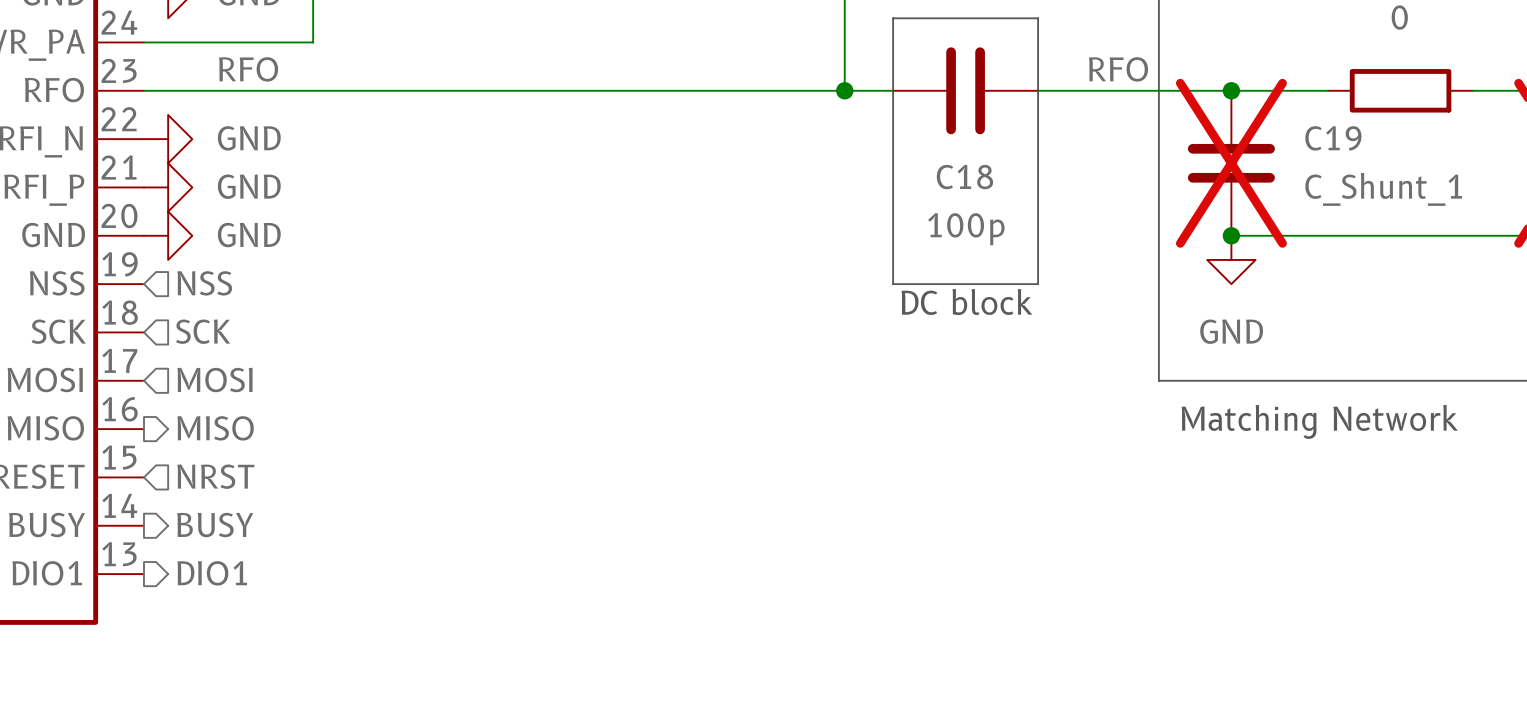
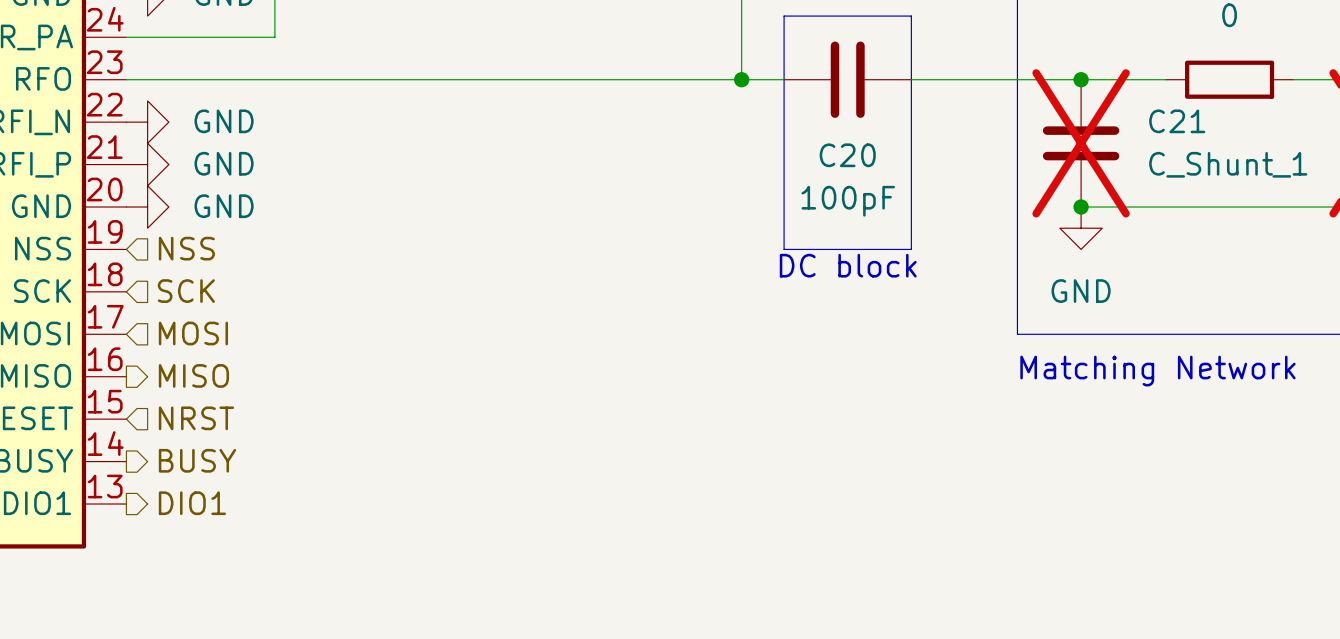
label: RFO (248, 69) -> none
label: RFO (1118, 69) -> none
C19 name: C19 (1333, 138) -> C21 (1177, 121)
C18 name: C18 (964, 177) -> C20 (847, 155)
C18 value: 100p (966, 229) -> 100pF (848, 201)

